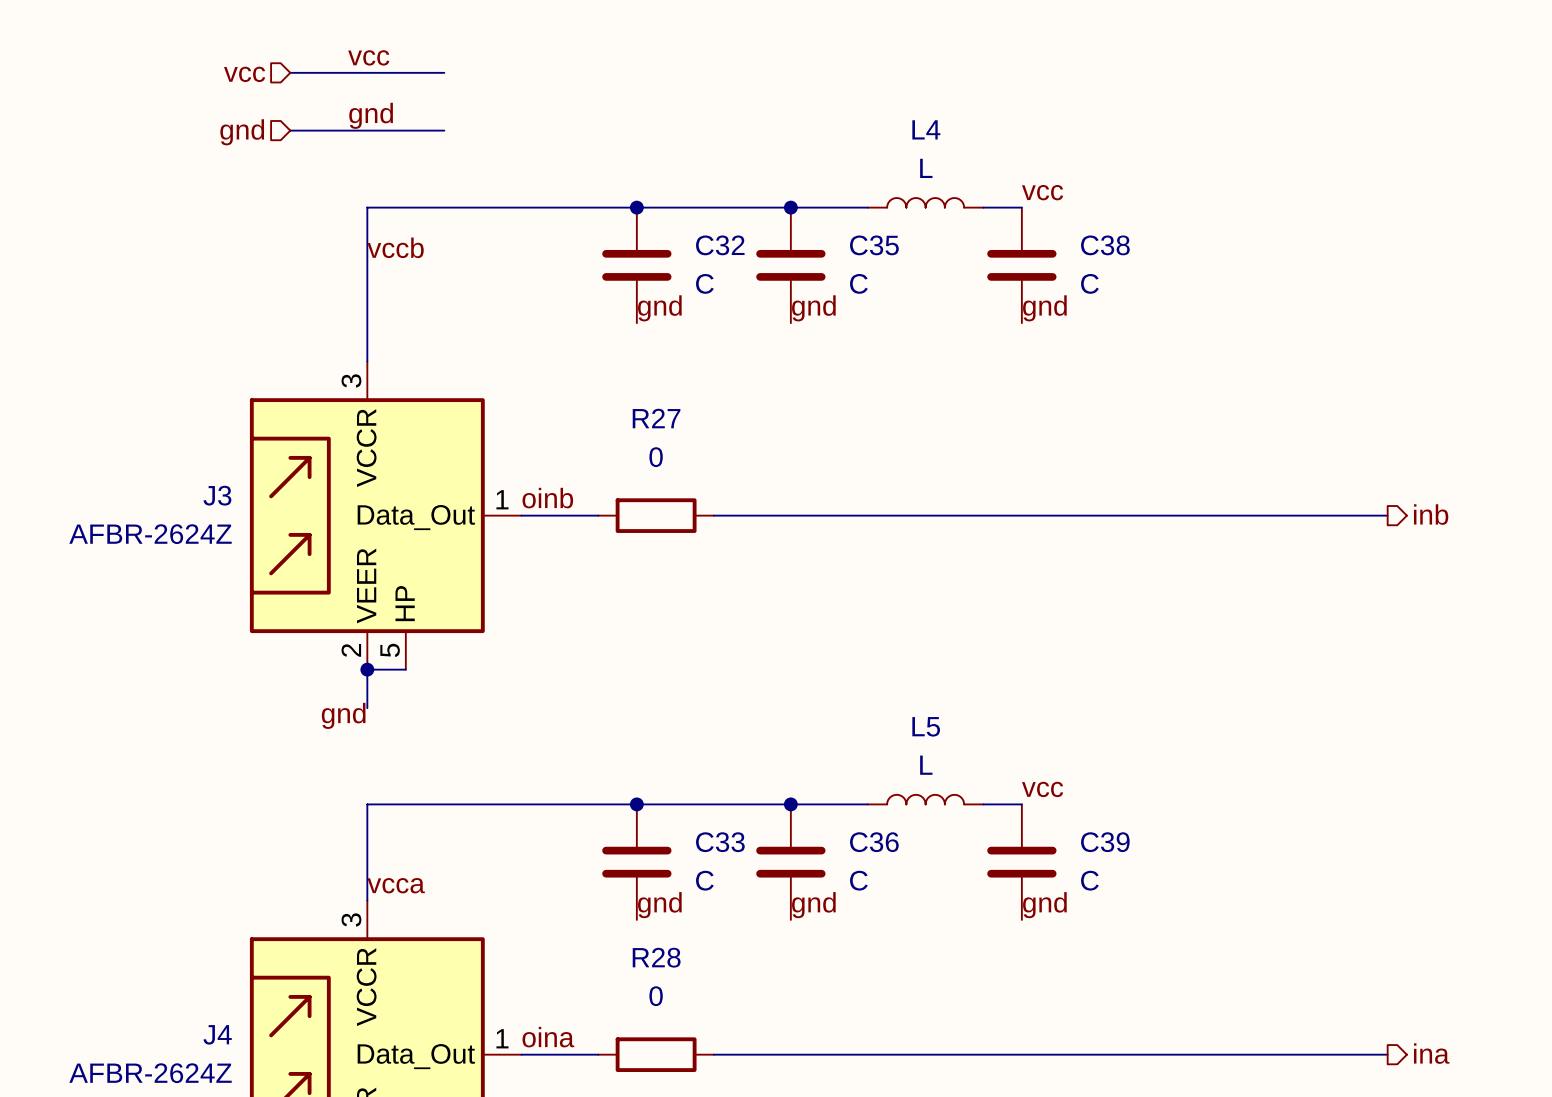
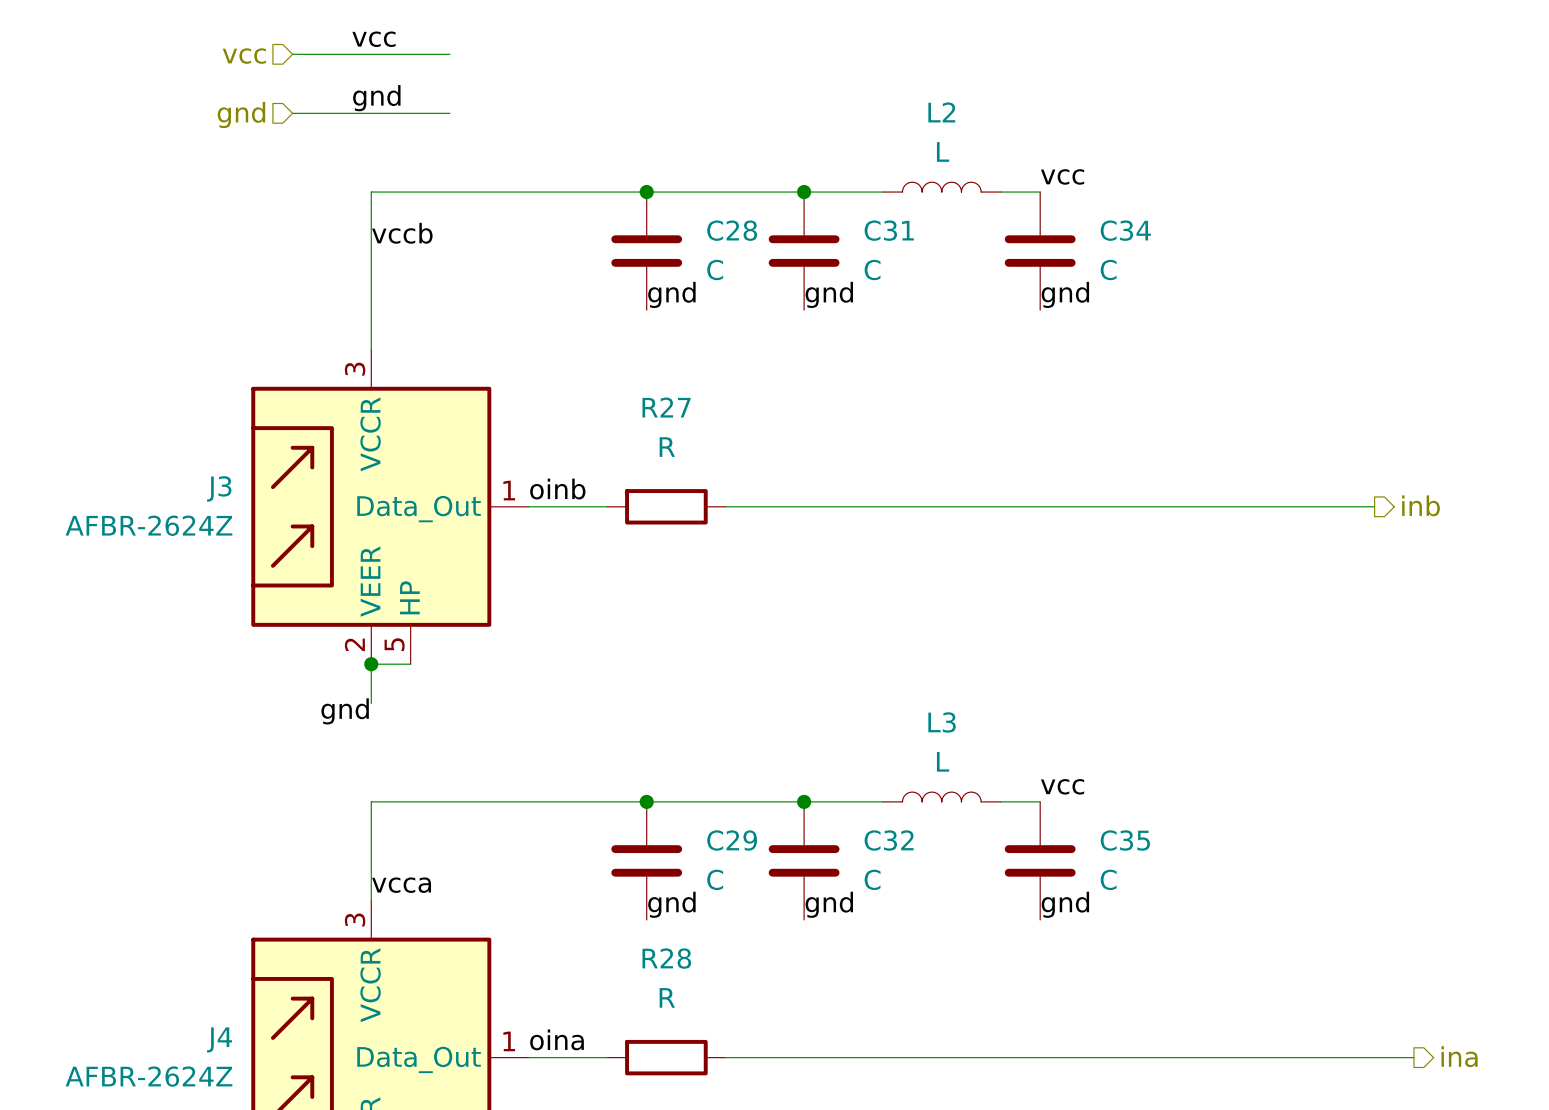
L4 name: L4 (926, 129) -> L2 (941, 112)
C32 name: C32 (720, 245) -> C28 (732, 230)
C35 name: C35 (874, 245) -> C31 (889, 230)
C38 name: C38 (1105, 245) -> C34 (1125, 230)
R27 value: 0 (656, 457) -> R (667, 447)
hierarchical label position: inb (1431, 514) -> inb (1421, 505)
wire: (1349, 515) (1387, 515) -> none
L5 name: L5 (926, 726) -> L3 (942, 722)
C33 name: C33 (720, 842) -> C29 (732, 840)
C36 name: C36 (874, 842) -> C32 (889, 840)
C39 name: C39 (1105, 842) -> C35 (1125, 840)
R28 value: 0 (656, 996) -> R (667, 997)

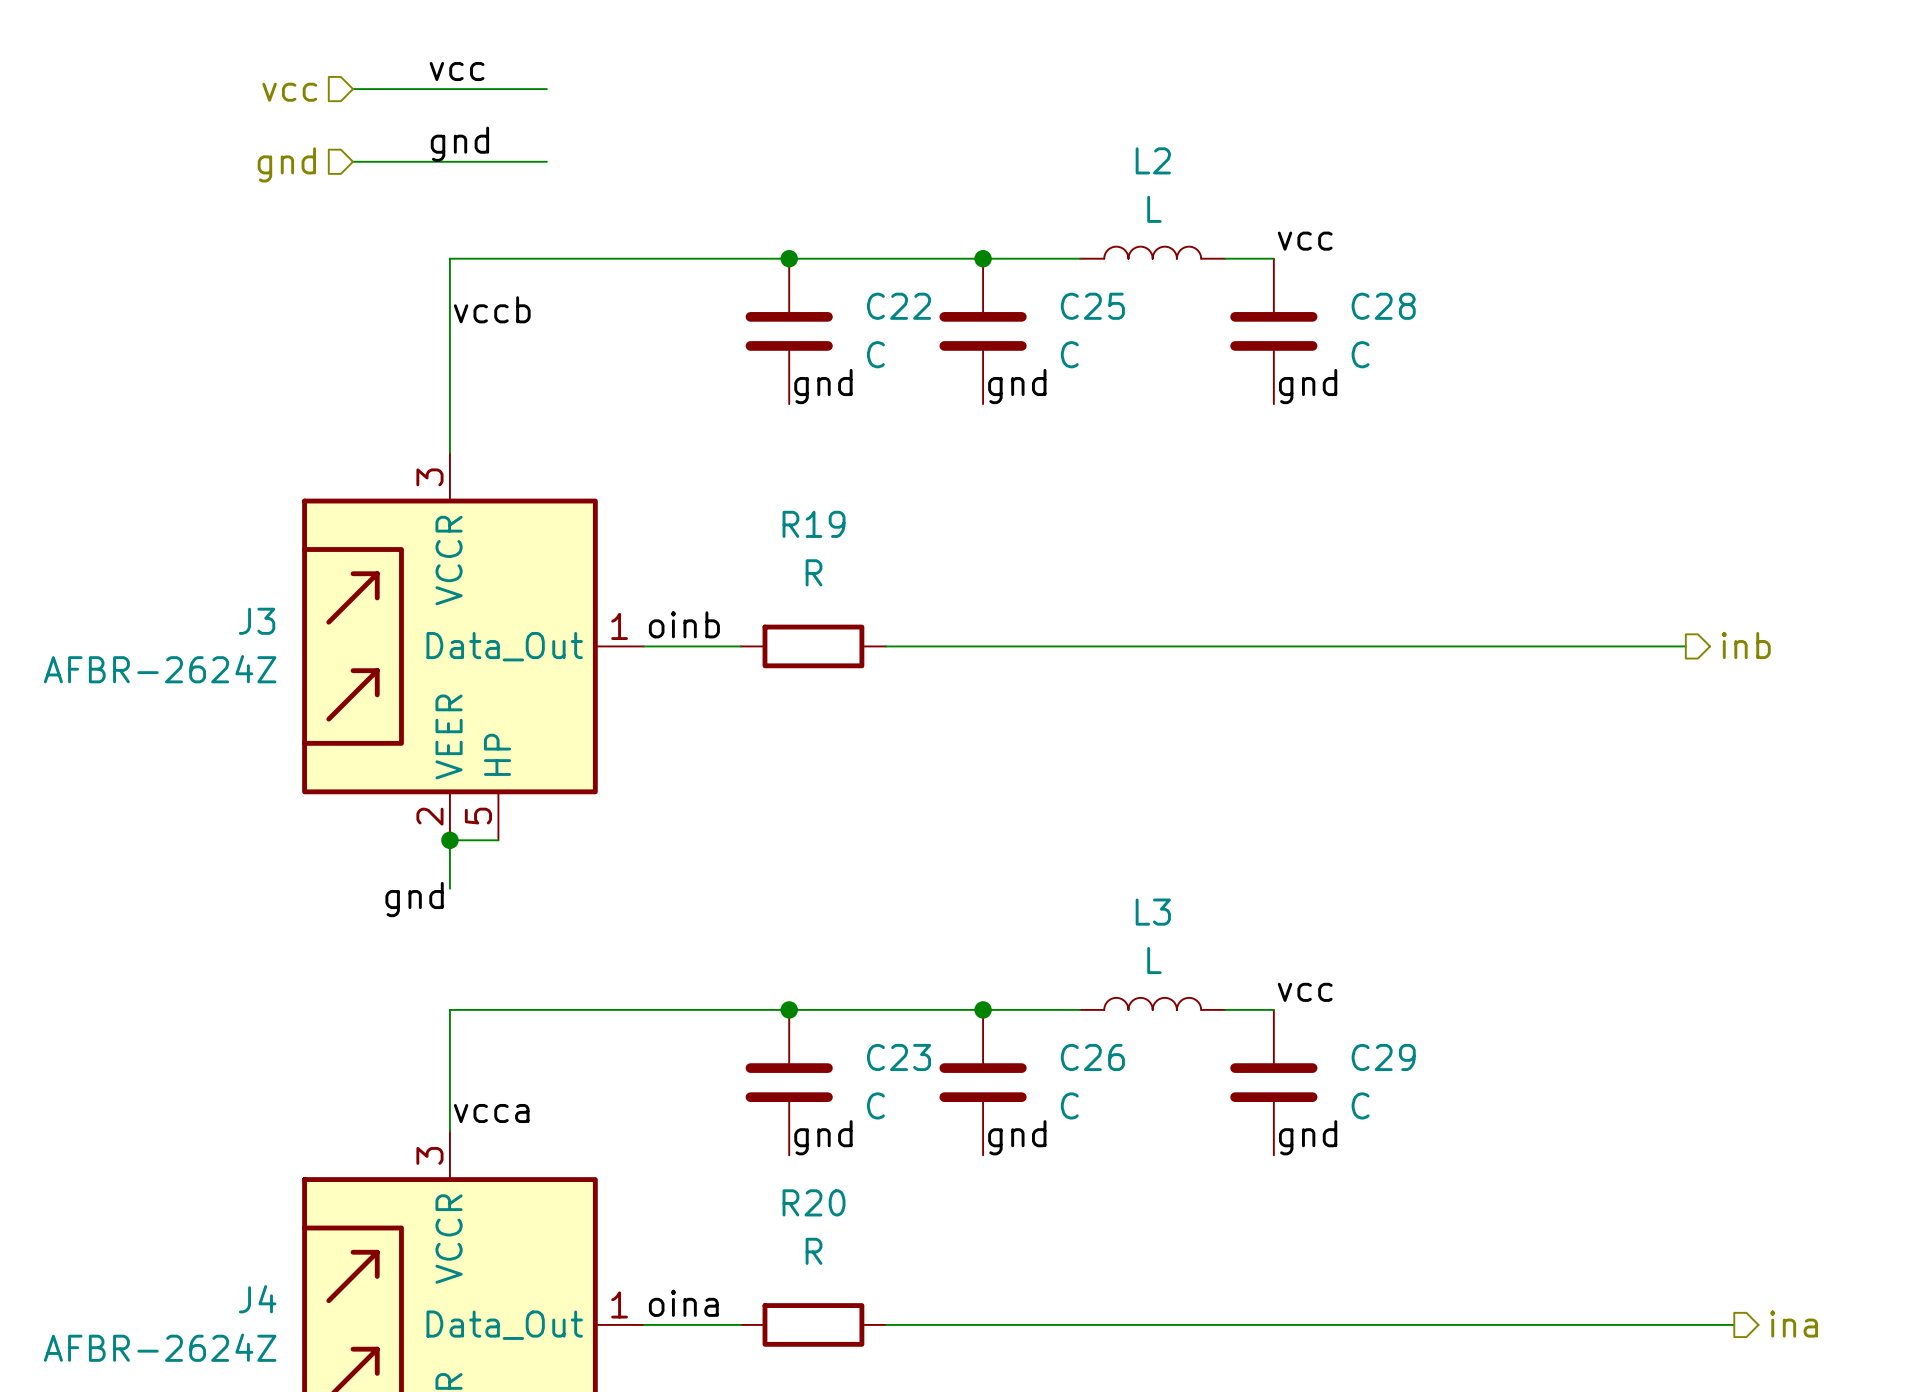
C28 name: C28 (732, 230) -> C22 (899, 306)
C31 name: C31 (889, 230) -> C25 (1092, 306)
C34 name: C34 (1125, 230) -> C28 (1383, 306)
R27 name: R27 (666, 407) -> R19 (814, 524)
C29 name: C29 (732, 840) -> C23 (899, 1057)
C32 name: C32 (889, 840) -> C26 (1092, 1057)
C35 name: C35 (1125, 840) -> C29 (1383, 1057)
R28 name: R28 (666, 958) -> R20 (814, 1202)

